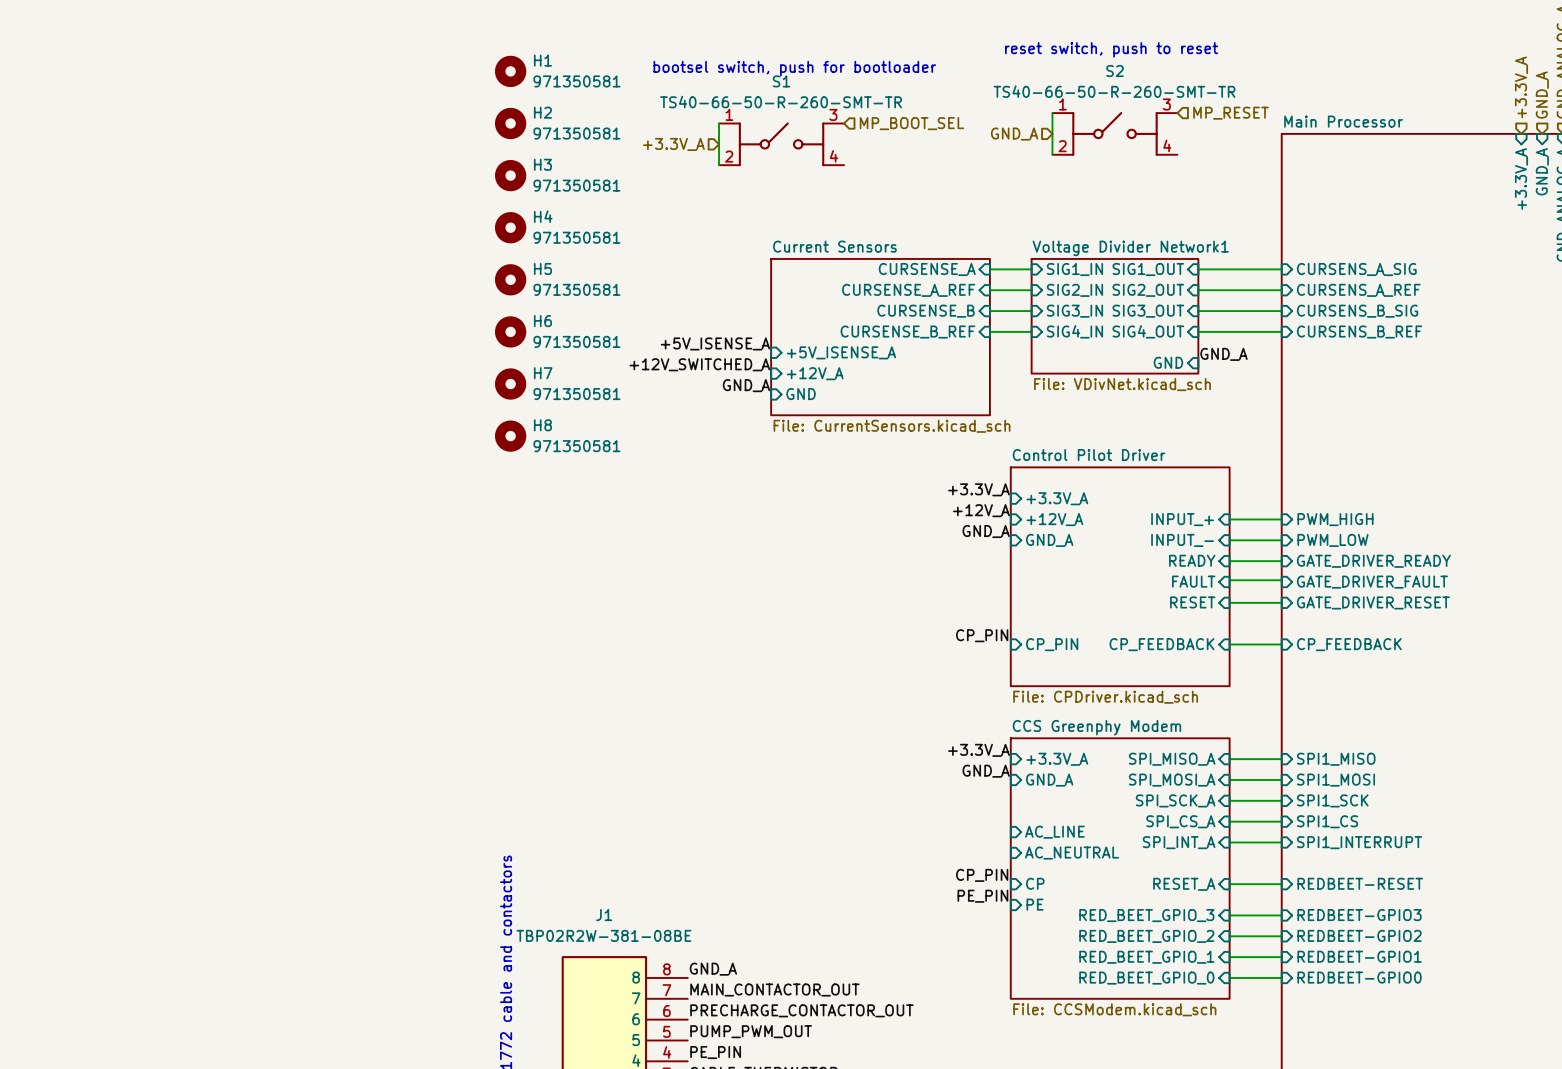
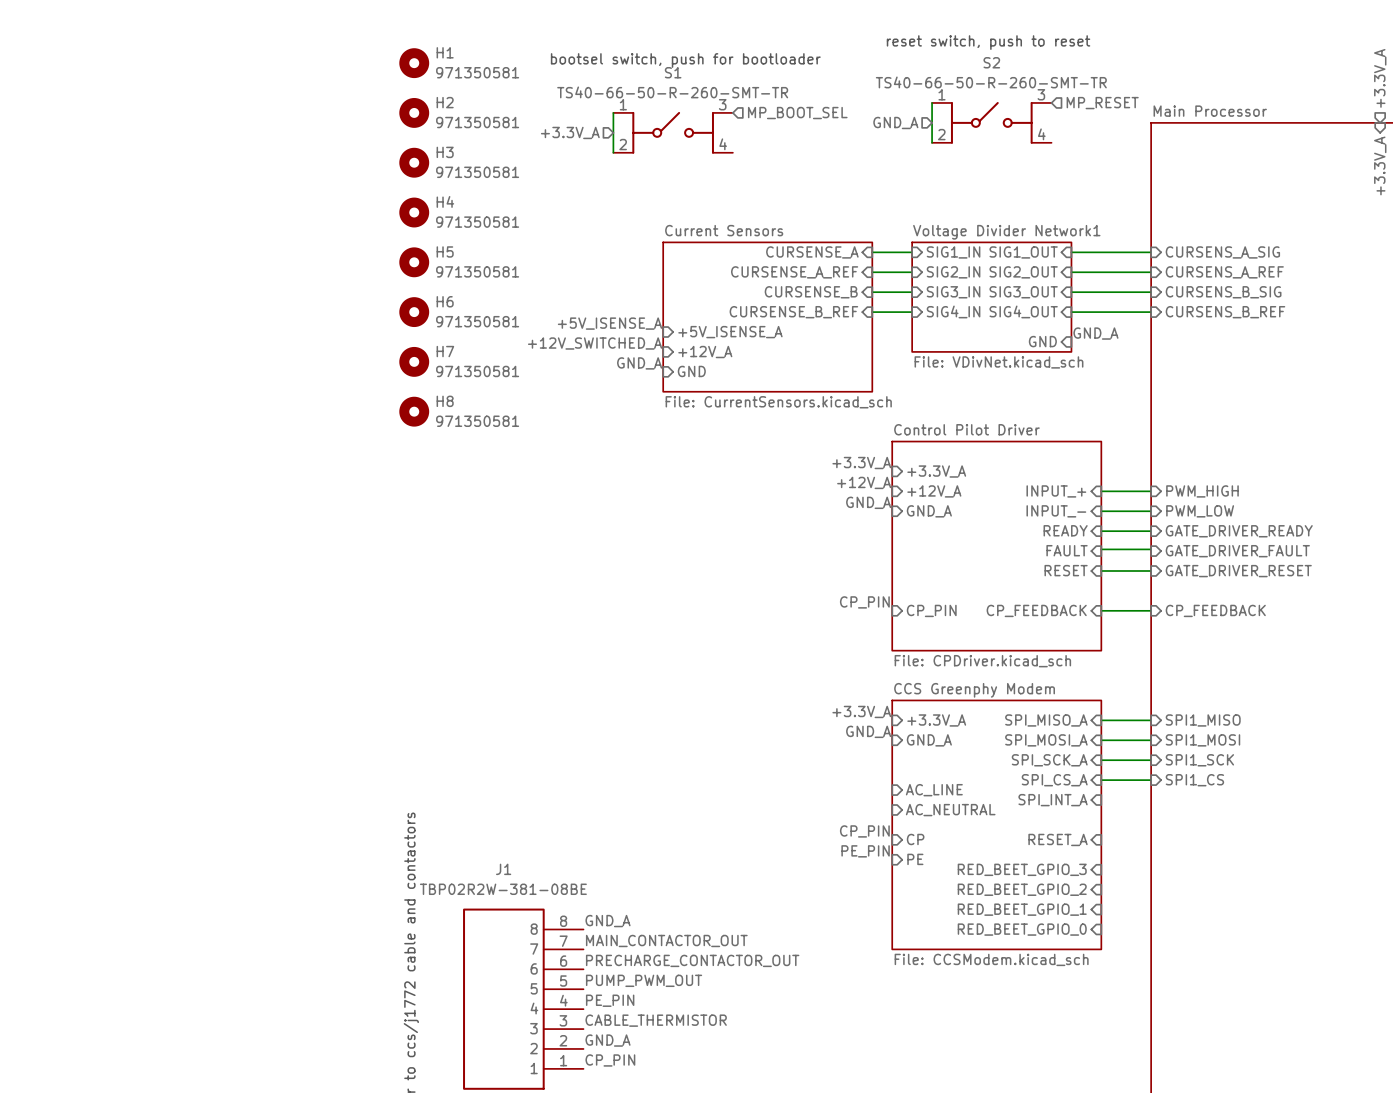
wire: (1229, 842) (1281, 842) -> none
sheet pin: SPI1_INTERRUPT (1359, 842) -> none
sheet pin: REDBEET-RESET (1360, 883) -> none
wire: (1229, 884) (1281, 884) -> none
wire: (1229, 915) (1281, 915) -> none
sheet pin: REDBEET-GPIO3 (1359, 915) -> none
sheet pin: REDBEET-GPIO2 (1359, 935) -> none
wire: (1229, 936) (1281, 936) -> none
sheet pin: REDBEET-GPIO1 (1359, 956) -> none
wire: (1229, 957) (1281, 957) -> none
wire: (1229, 977) (1281, 977) -> none
sheet pin: REDBEET-GPIO0 (1359, 977) -> none

